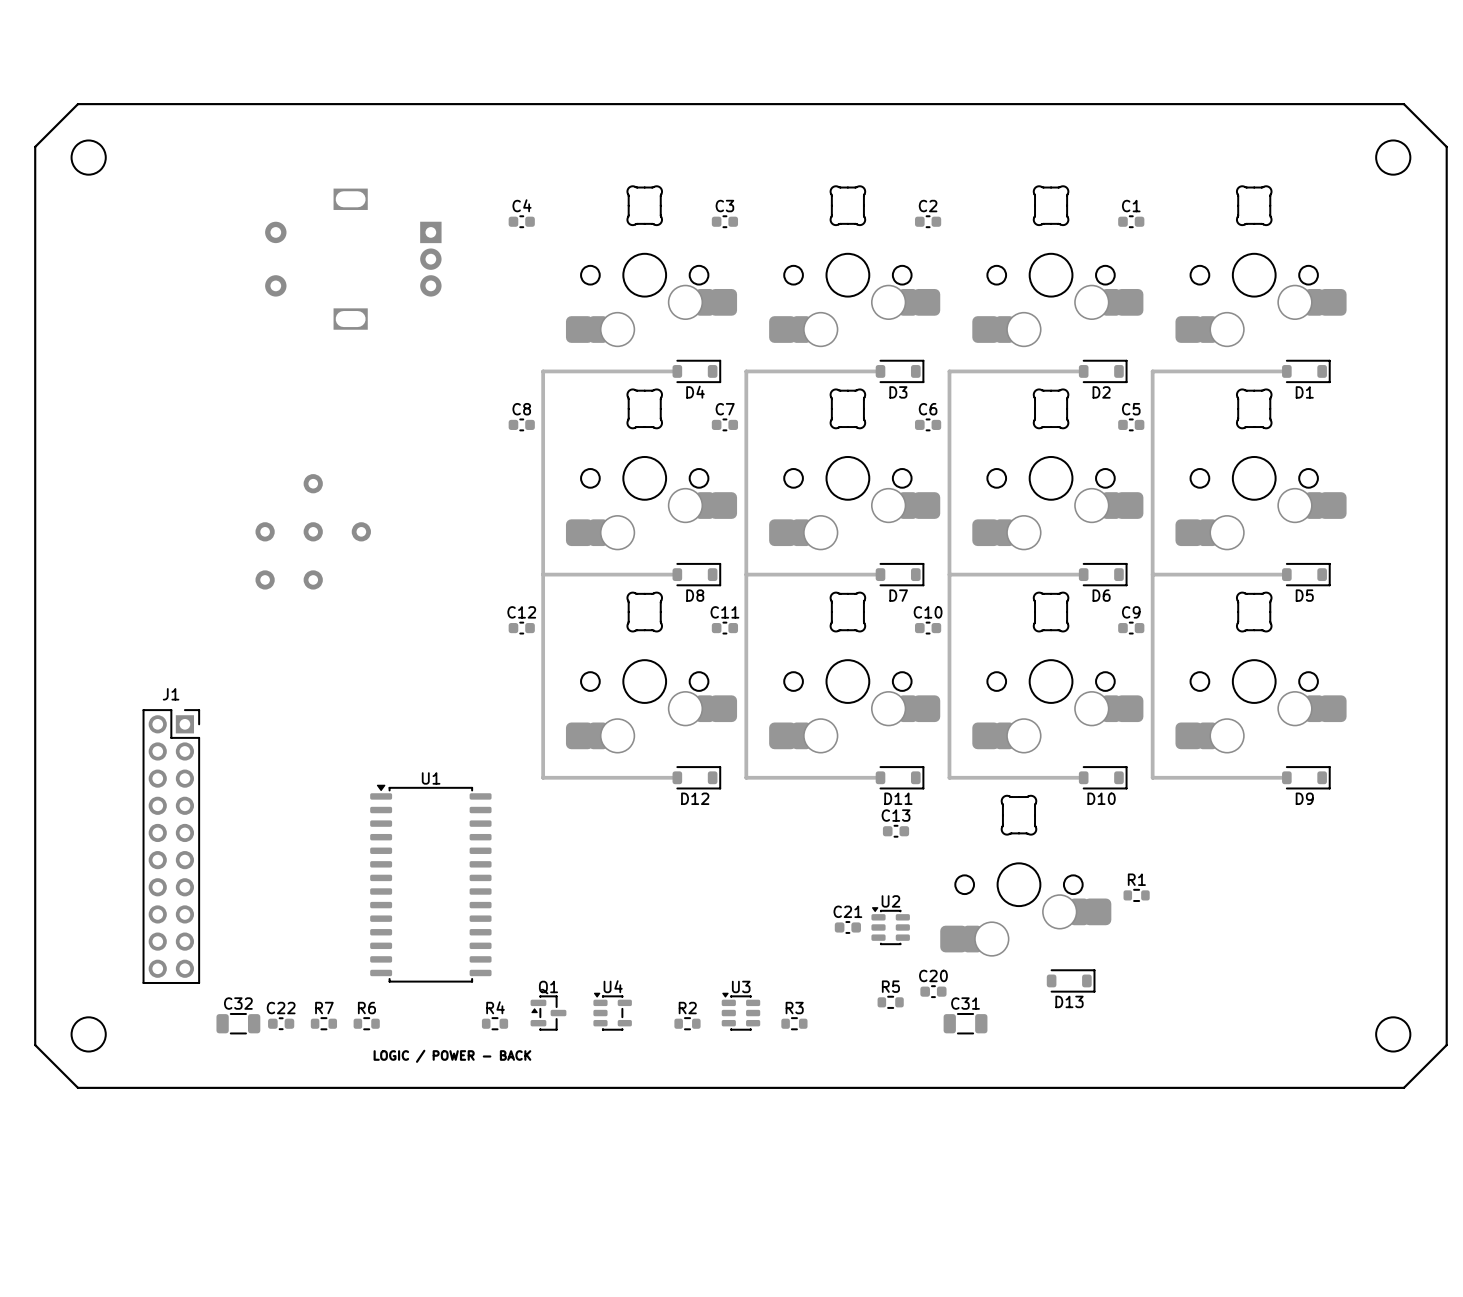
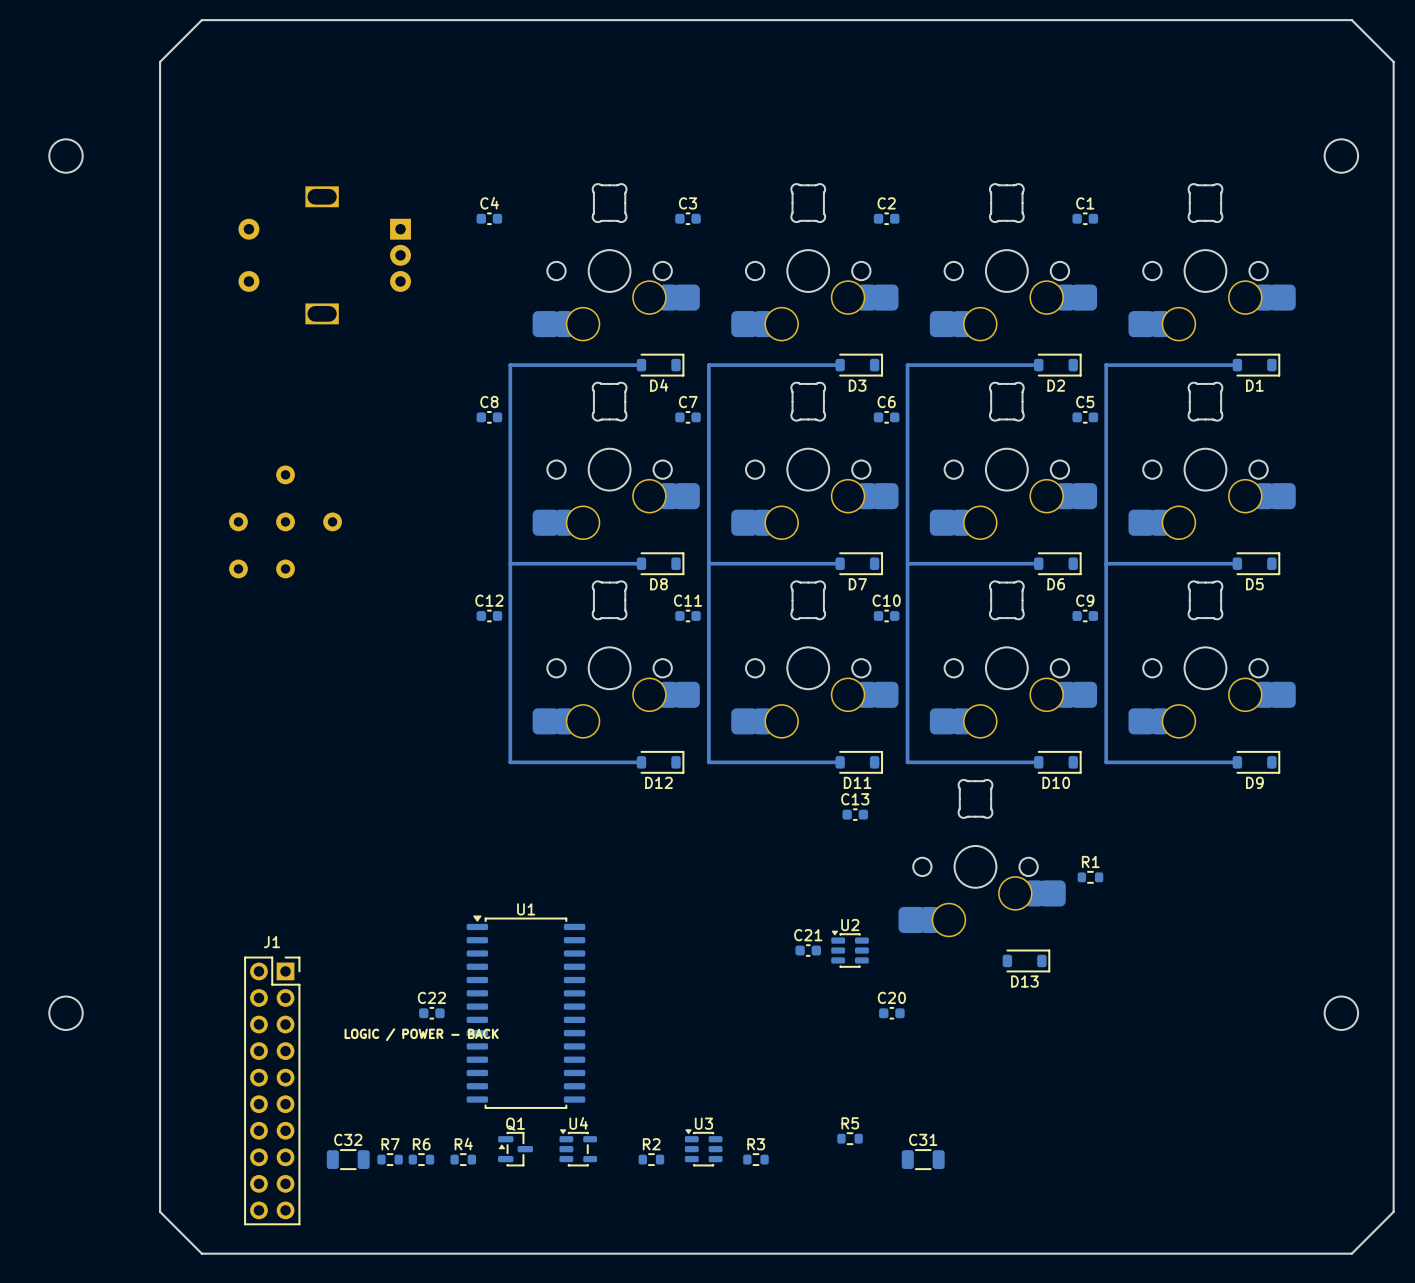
board edge: (1446, 146) (1403, 104) (77, 104) (35, 146) (35, 1045) (77, 1087) (1403, 1087) (1446, 1045) -> (1393, 145) (1393, 61) (1351, 20) (201, 20) (160, 61) (160, 1211) (201, 1253) (1351, 1253) (1393, 1211) (1393, 1023)
J1 position: (171, 846) -> (272, 1090)
U1 position: (430, 883) -> (525, 1012)
U2 position: (890, 925) -> (850, 949)
C21 position: (847, 927) -> (808, 950)
C20 position: (933, 991) -> (891, 1013)
R5 position: (890, 1002) -> (850, 1138)
U4 position: (612, 1011) -> (578, 1147)
U3 position: (740, 1011) -> (703, 1147)
Q1 position: (548, 1013) -> (515, 1149)
C32 position: (238, 1023) -> (348, 1159)
C22 position: (281, 1023) -> (431, 1013)
R7 position: (323, 1023) -> (390, 1159)
R6 position: (366, 1023) -> (421, 1159)
R4 position: (495, 1023) -> (463, 1159)
R2 position: (687, 1023) -> (651, 1159)
R3 position: (794, 1023) -> (755, 1159)
C31 position: (965, 1023) -> (923, 1159)

